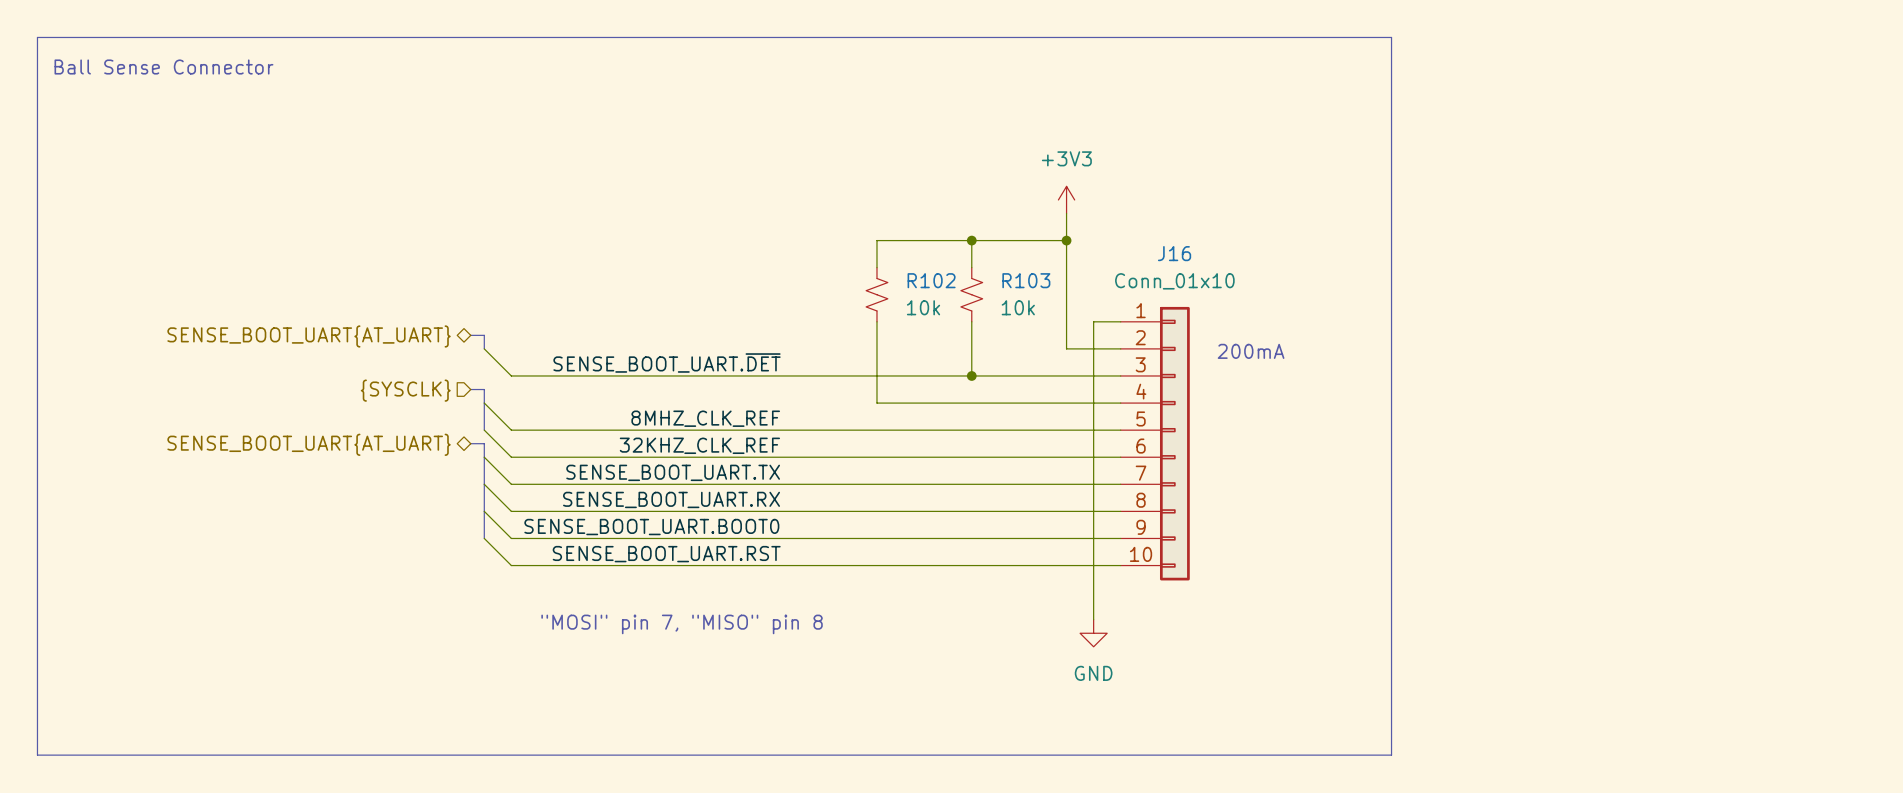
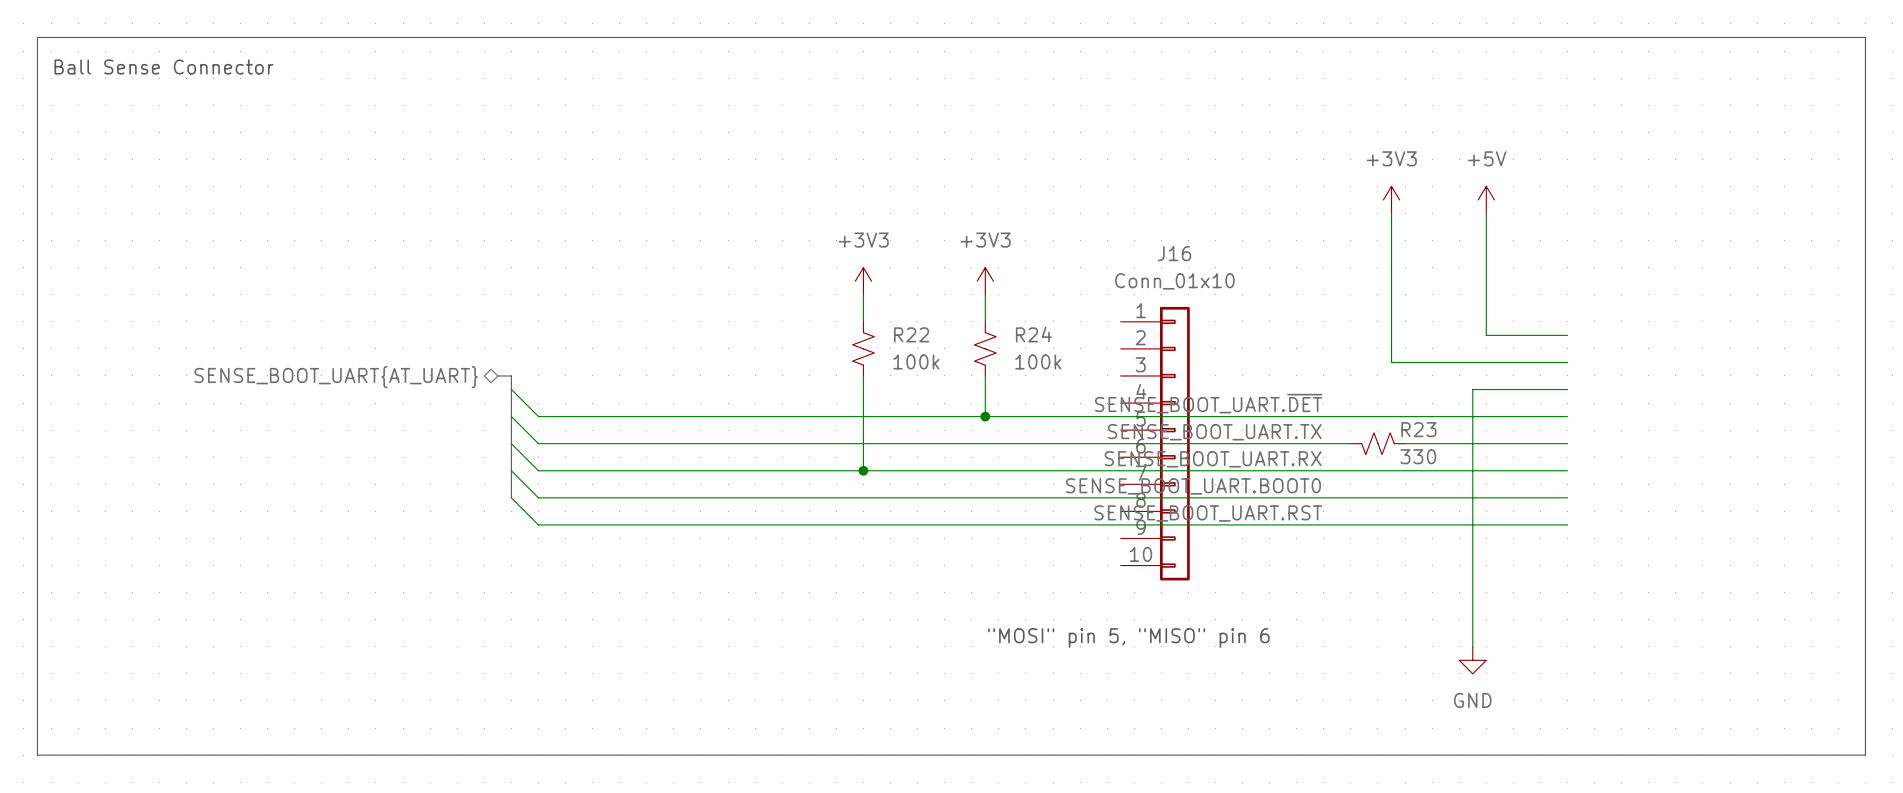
line: (1391, 37) (1391, 755) -> (1391, 37) (1865, 37) (1865, 755) (1391, 755)
power symbol: +3V3 (1066, 199) -> none
power symbol: none -> +3V3 (1391, 199)
power symbol: none -> +5V (1486, 199)
wire: (1066, 213) (1066, 348) (1120, 348) -> none
wire: none -> (1391, 213) (1391, 362) (1567, 362)
wire: none -> (1486, 213) (1486, 335) (1567, 335)
wire: (971, 240) (971, 267) -> (985, 294) (985, 321)
junction: (971, 240) -> none
wire: (1066, 240) (876, 240) (876, 267) -> none
junction: (1066, 240) -> none
power symbol: none -> +3V3 (863, 281)
power symbol: none -> +3V3 (985, 281)
wire: none -> (863, 294) (863, 321)
R102: 10k (876, 294) -> none
R103: 10k (971, 294) -> none
wire: (876, 321) (876, 403) (1120, 403) -> none
wire: (971, 321) (971, 375) -> none
wire: (1120, 321) (1093, 321) (1093, 619) -> none
bus: (470, 335) (484, 335) (484, 348) -> none
hierarchical label: SENSE_BOOT_UART{AT_UART} (309, 336) -> none
wire: (484, 348) (511, 375) (1120, 375) -> none
R22: none -> 100k (863, 348)
R24: none -> 100k (985, 348)
text: 200mA (1251, 351) -> none
label: SENSE_BOOT_UART.~{DET} (667, 362) -> none
bus: none -> (497, 375) (511, 375) (511, 497)
wire: none -> (863, 375) (863, 470)
junction position: (971, 375) -> (985, 416)
wire: none -> (985, 375) (985, 416)
hierarchical label: none -> SENSE_BOOT_UART{AT_UART} (336, 377)
bus: (470, 389) (484, 389) (484, 430) -> none
wire: none -> (511, 389) (538, 416) (1567, 416)
wire: none -> (1567, 389) (1472, 389) (1472, 646)
hierarchical label: {SYSCLK} (405, 390) -> none
wire: (484, 403) (511, 430) (1120, 430) -> none
label: none -> SENSE_BOOT_UART.~{DET} (1208, 403)
wire: none -> (511, 416) (538, 443) (1350, 443)
label: 8MHZ_CLK_REF (705, 418) -> none
wire: (484, 430) (511, 457) (1120, 457) -> none
label: none -> SENSE_BOOT_UART.TX (1214, 432)
bus: (470, 443) (484, 443) (484, 538) -> none
wire: none -> (511, 443) (538, 470) (1567, 470)
R23: none -> 330 (1377, 443)
wire: none -> (1405, 443) (1567, 443)
hierarchical label: SENSE_BOOT_UART{AT_UART} (309, 444) -> none
label: 32KHZ_CLK_REF (699, 445) -> none
wire: (484, 457) (511, 484) (1120, 484) -> none
label: none -> SENSE_BOOT_UART.RX (1213, 459)
wire: none -> (511, 470) (538, 497) (1567, 497)
junction: none -> (863, 470)
label: SENSE_BOOT_UART.TX (673, 472) -> none
wire: (484, 484) (511, 511) (1120, 511) -> none
label: none -> SENSE_BOOT_UART.BOOT0 (1193, 486)
wire: none -> (511, 497) (538, 524) (1567, 524)
label: SENSE_BOOT_UART.RX (671, 499) -> none
wire: (484, 511) (511, 538) (1120, 538) -> none
label: none -> SENSE_BOOT_UART.RST (1208, 513)
label: SENSE_BOOT_UART.BOOT0 (651, 527) -> none
wire: (484, 538) (511, 565) (1120, 565) -> none
label: SENSE_BOOT_UART.RST (666, 554) -> none
text: "MOSI" pin 7, "MISO" pin 8 (682, 624) -> none
power symbol: GND (1093, 633) -> none
text: none -> "MOSI" pin 5, "MISO" pin 6 (1128, 637)
power symbol: none -> GND (1472, 660)

